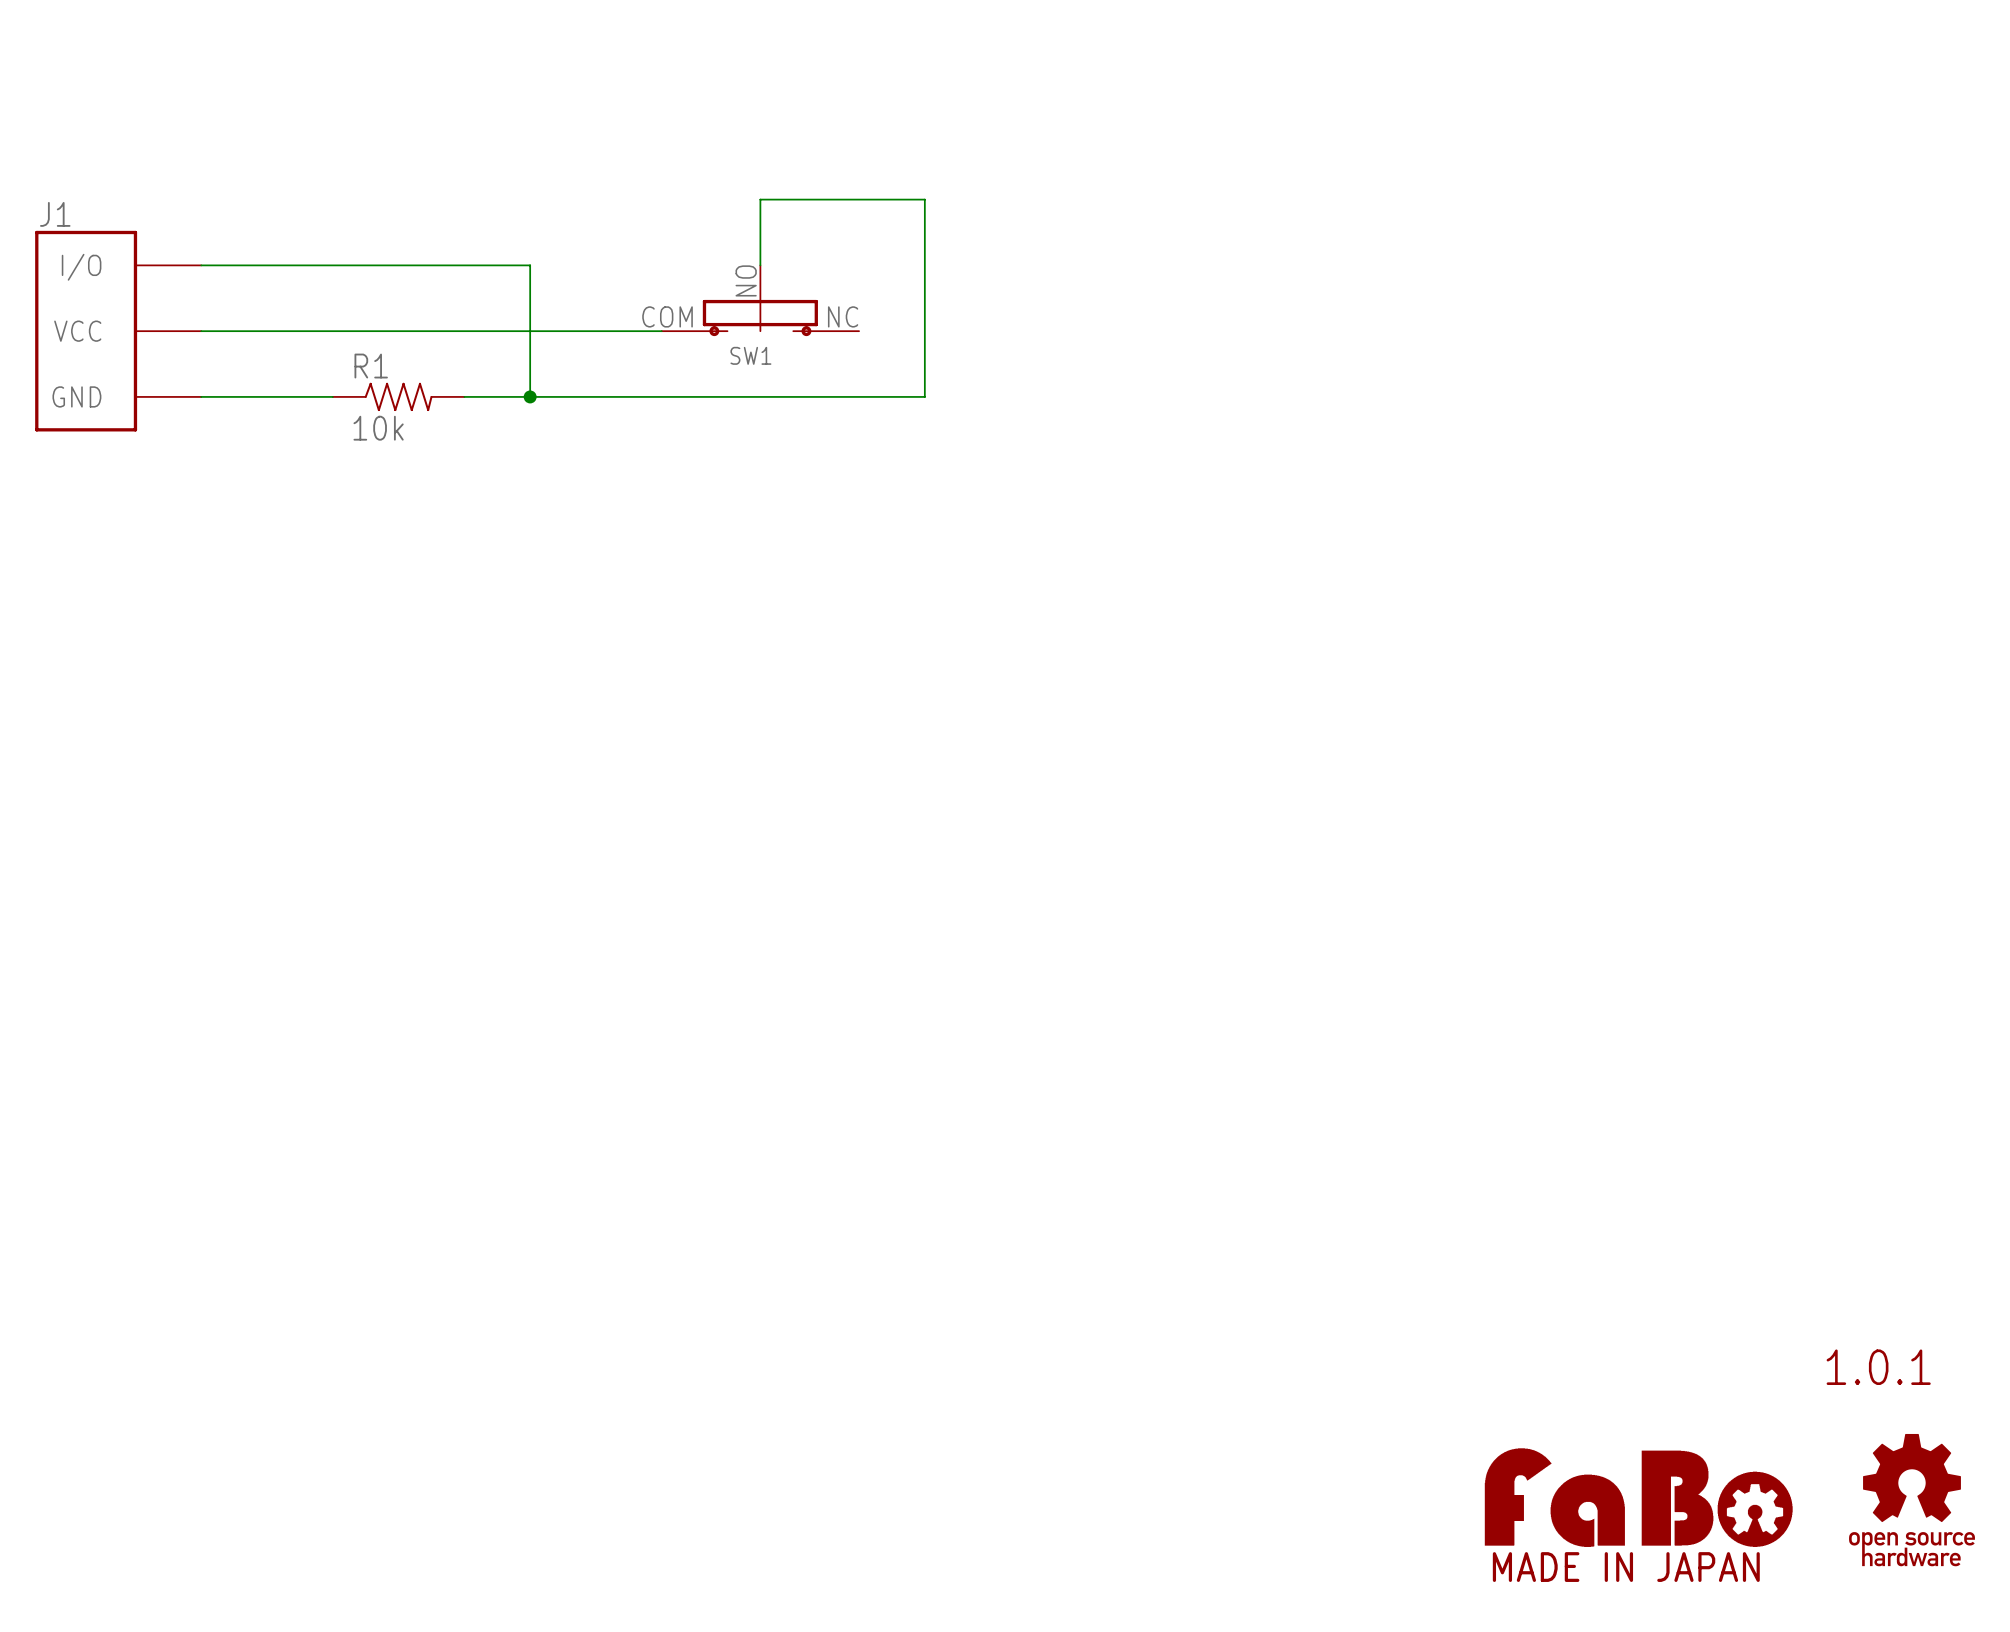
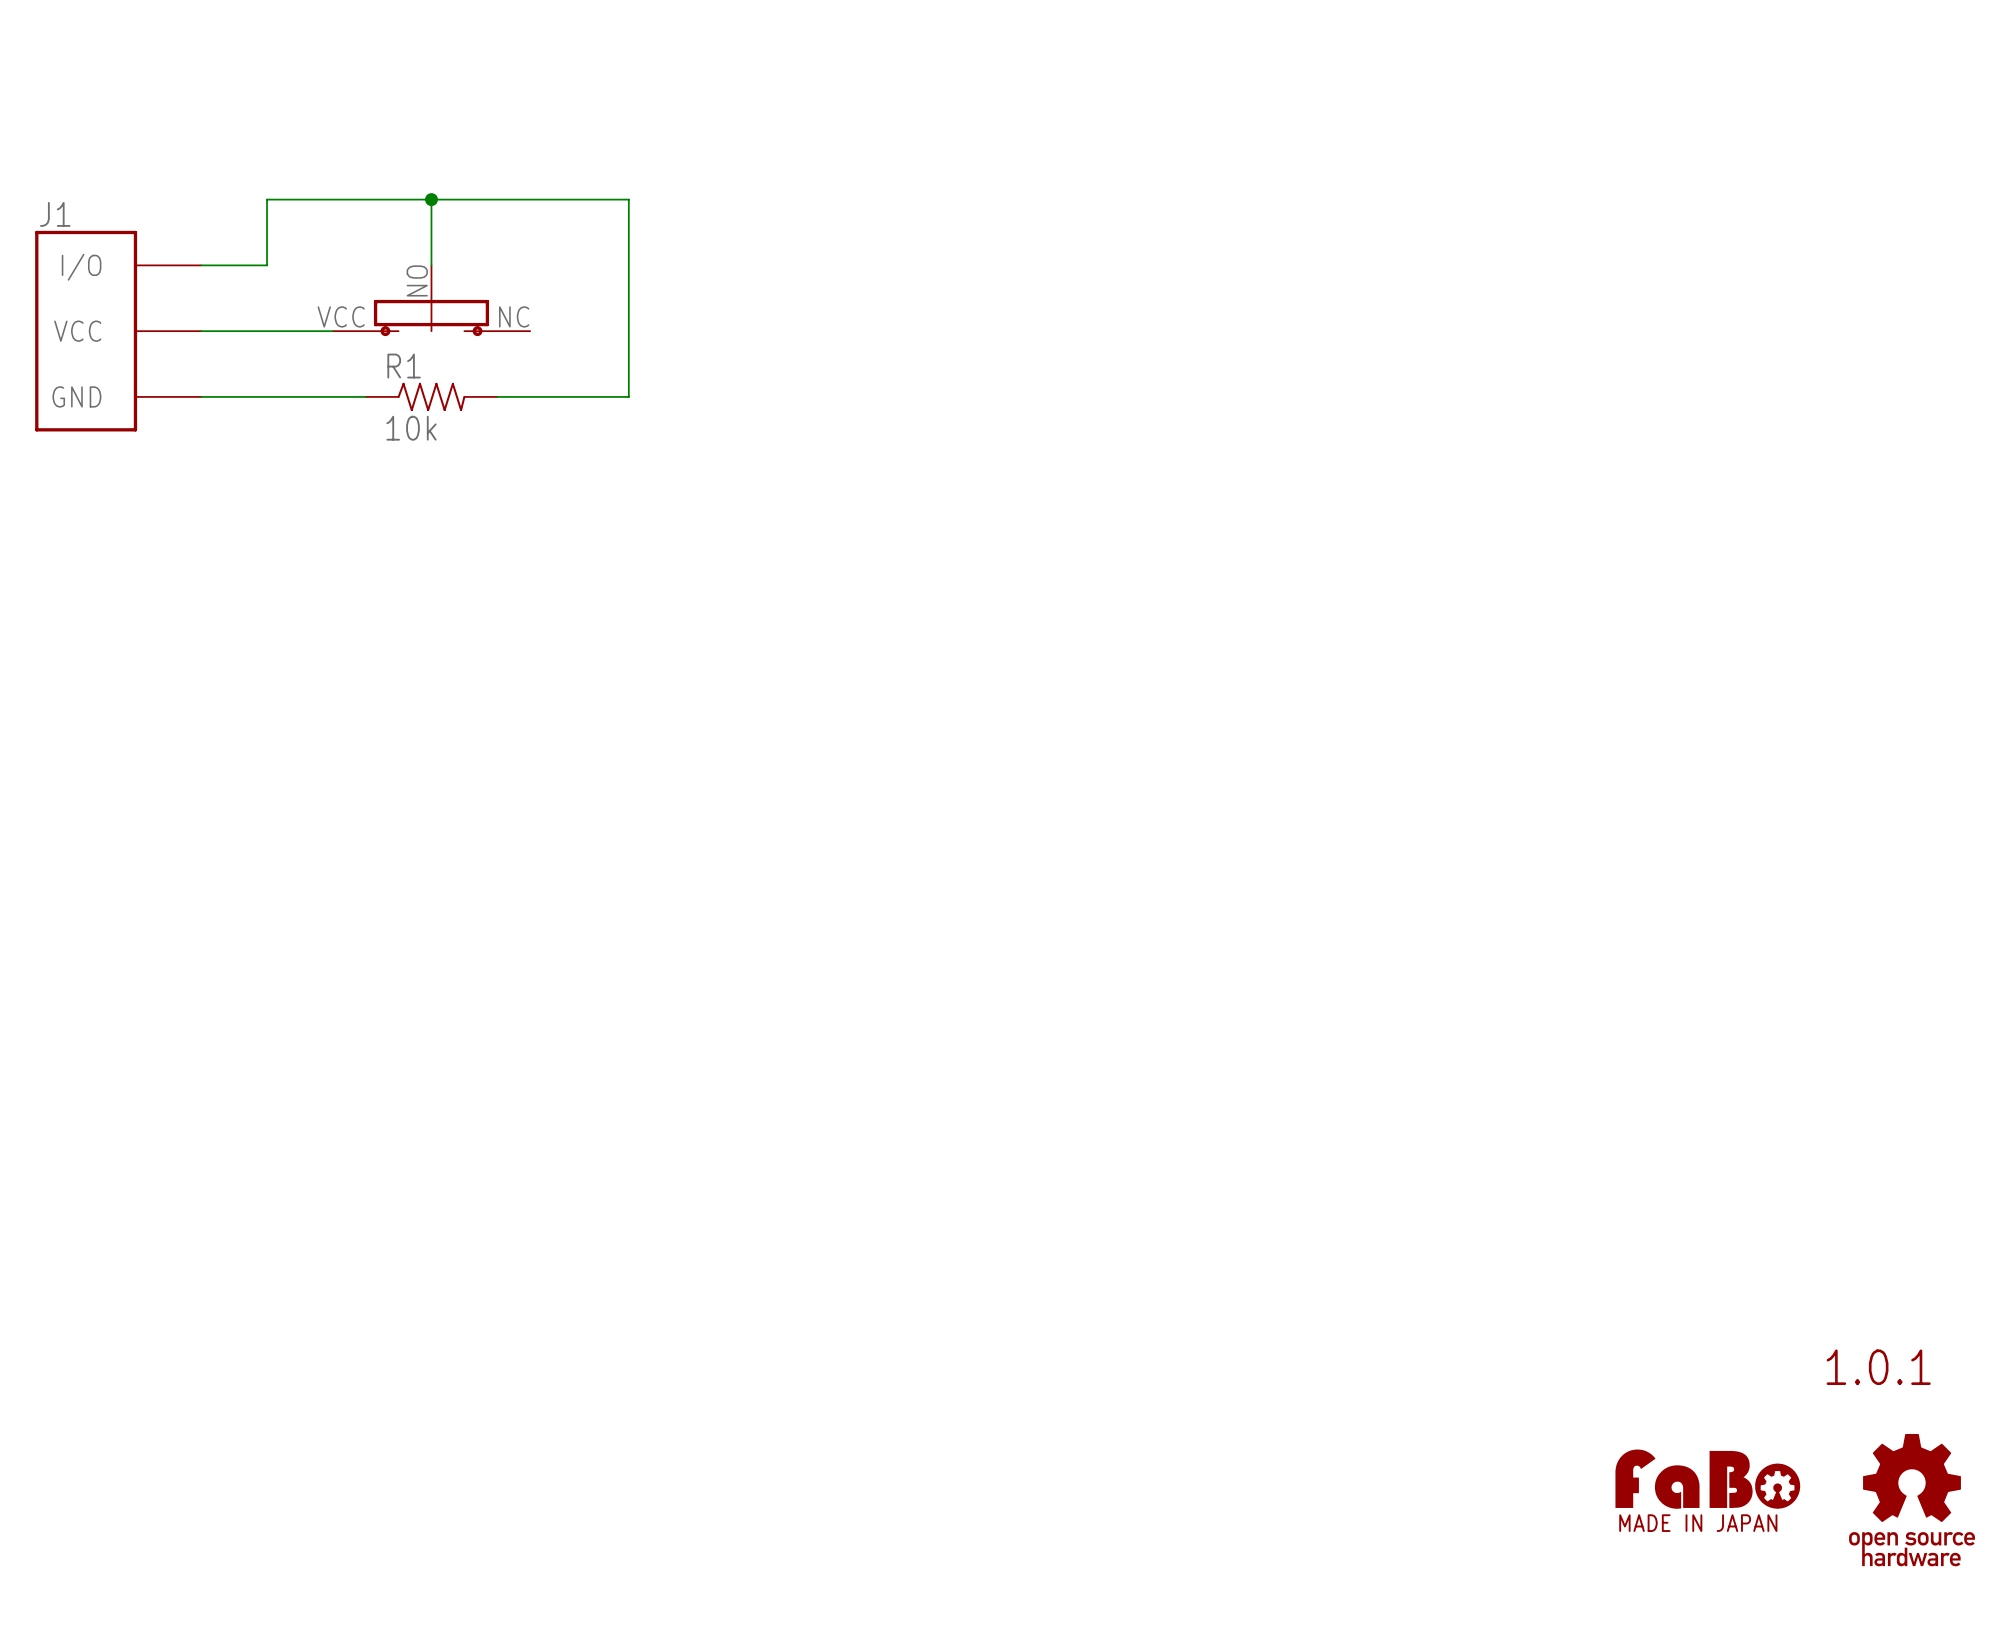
wire: none -> (431, 199) (431, 265)
junction: none -> (431, 199)
wire: (267, 265) (530, 265) (530, 396) -> (267, 265) (267, 199) (628, 199) (628, 396)
wire: (760, 265) (760, 199) (924, 199) (924, 396) (628, 396) -> none
part: none -> (431, 300)
SW1: (760, 300) -> none
wire: (332, 331) (661, 331) -> none
R1 position: (398, 396) -> (431, 396)
junction: (530, 396) -> none
part: none -> (1707, 1479)
part: (1638, 1497) -> none

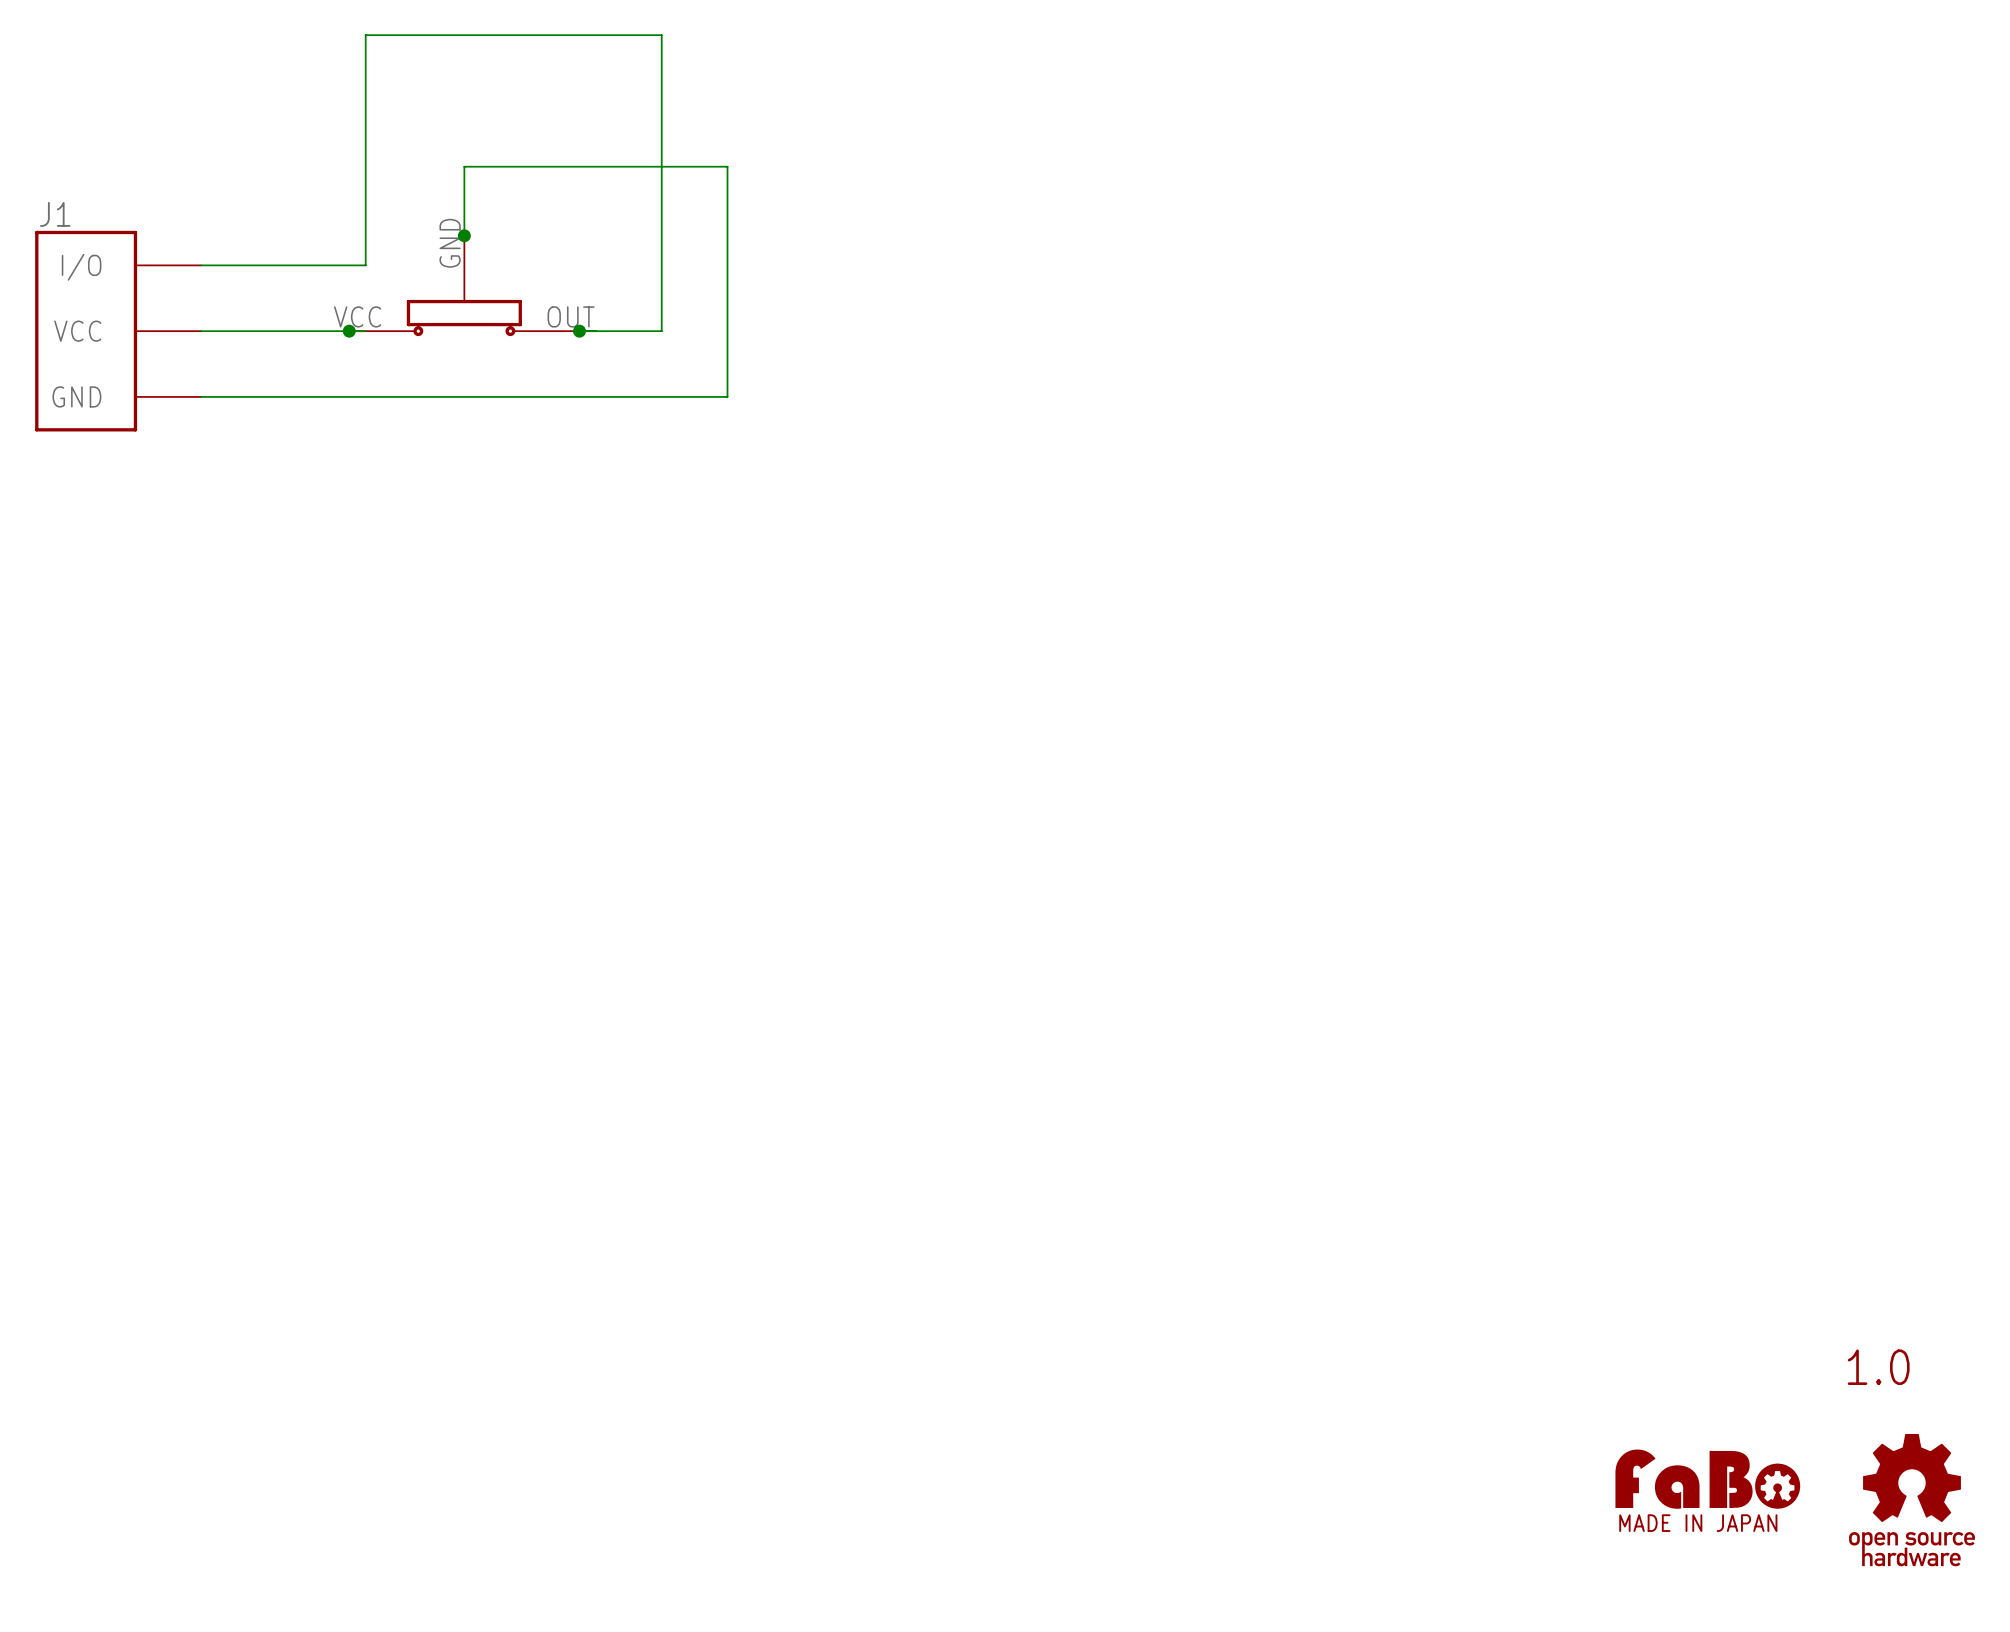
wire: (431, 199) (431, 265) -> none
junction position: (431, 199) -> (464, 235)
wire: none -> (464, 235) (464, 166) (727, 166) (727, 396) (628, 396)
wire: (267, 265) (267, 199) (628, 199) (628, 396) -> (267, 265) (365, 265) (365, 35) (661, 35) (661, 331) (579, 331)
part: none -> (464, 285)
part: (431, 300) -> none
junction: none -> (349, 331)
junction: none -> (579, 331)
R1: 10k (431, 396) -> none
text: 1.0.1 (1878, 1367) -> 1.0 (1878, 1367)

